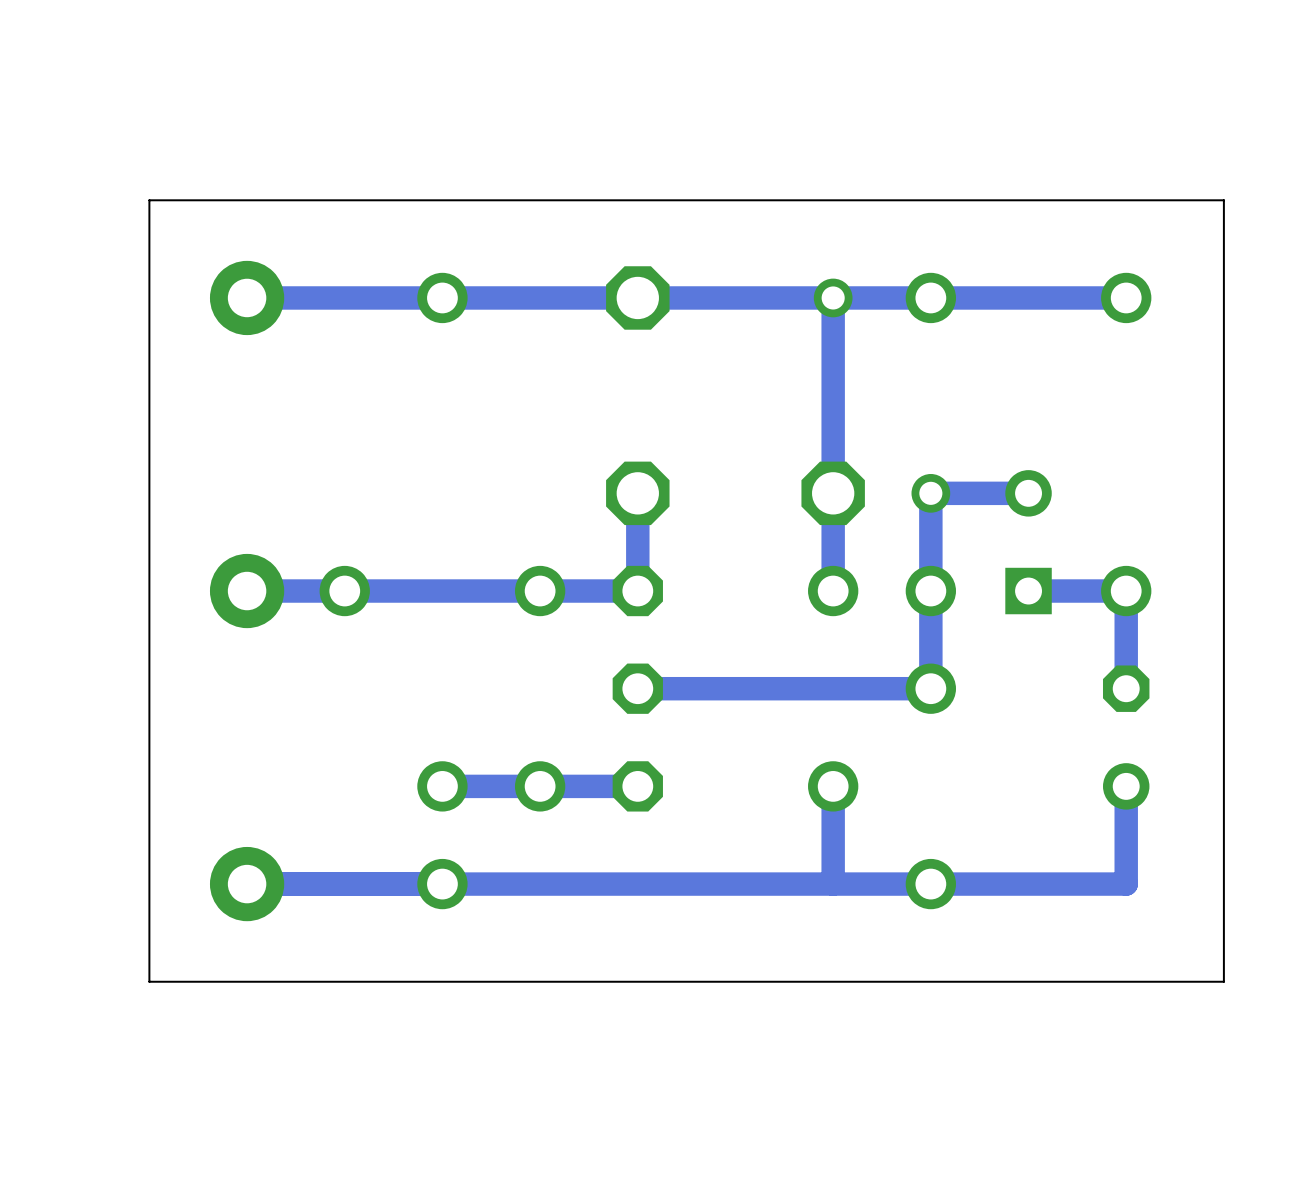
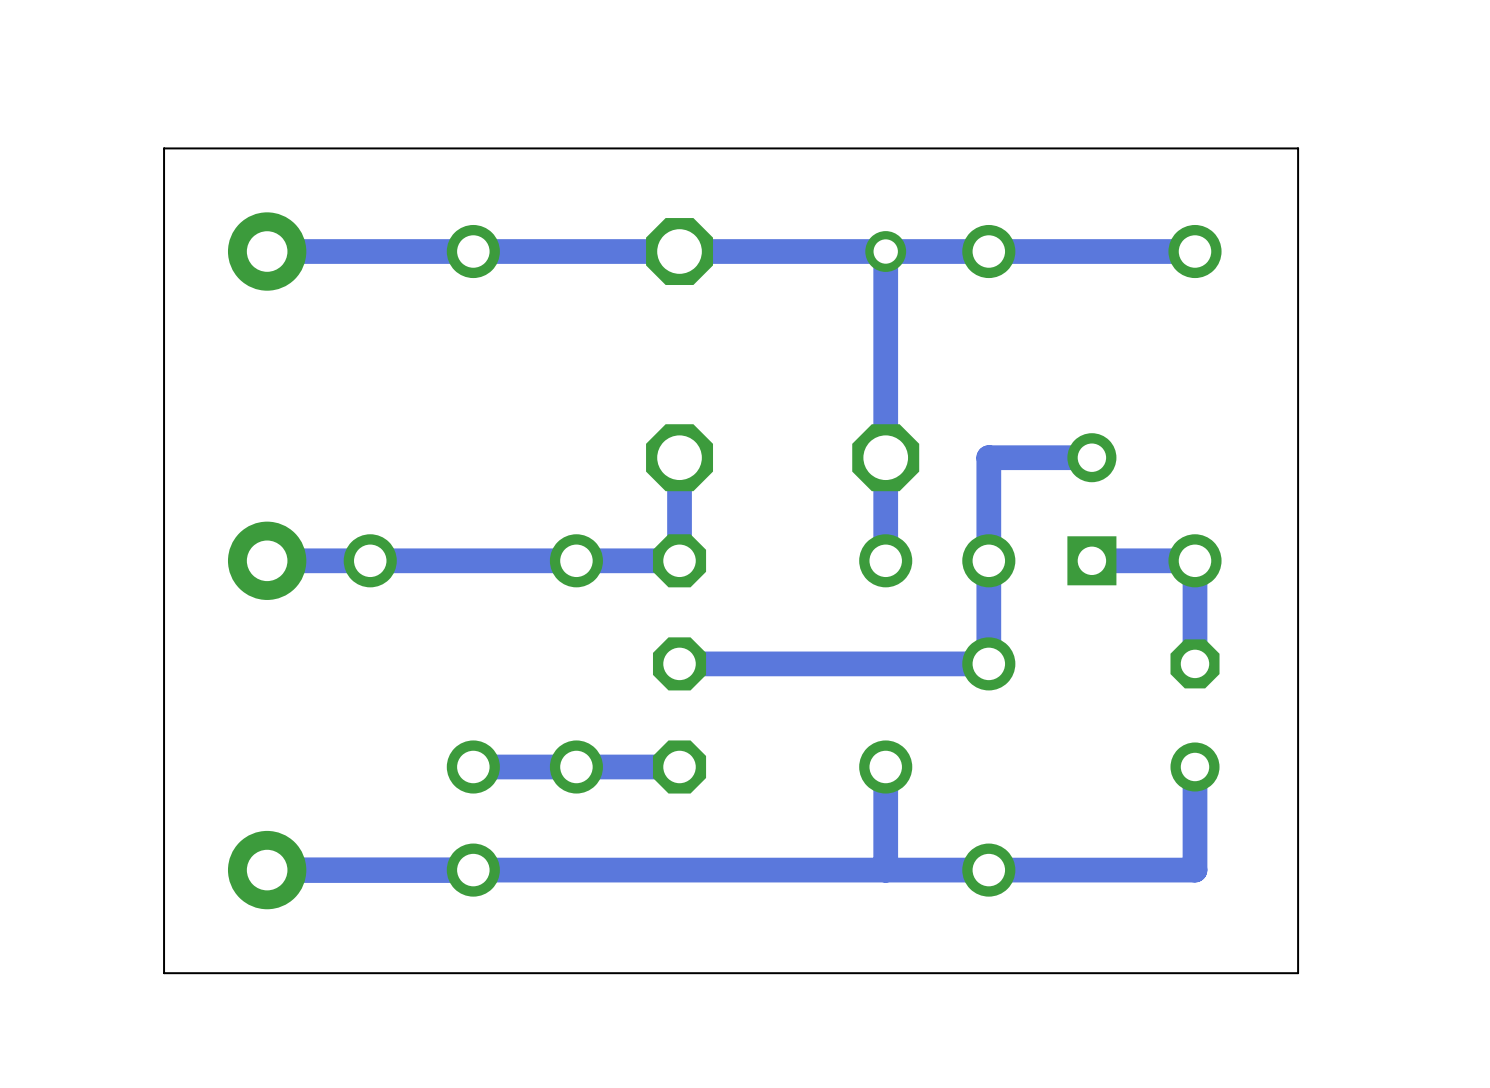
via: (930, 493) -> none

